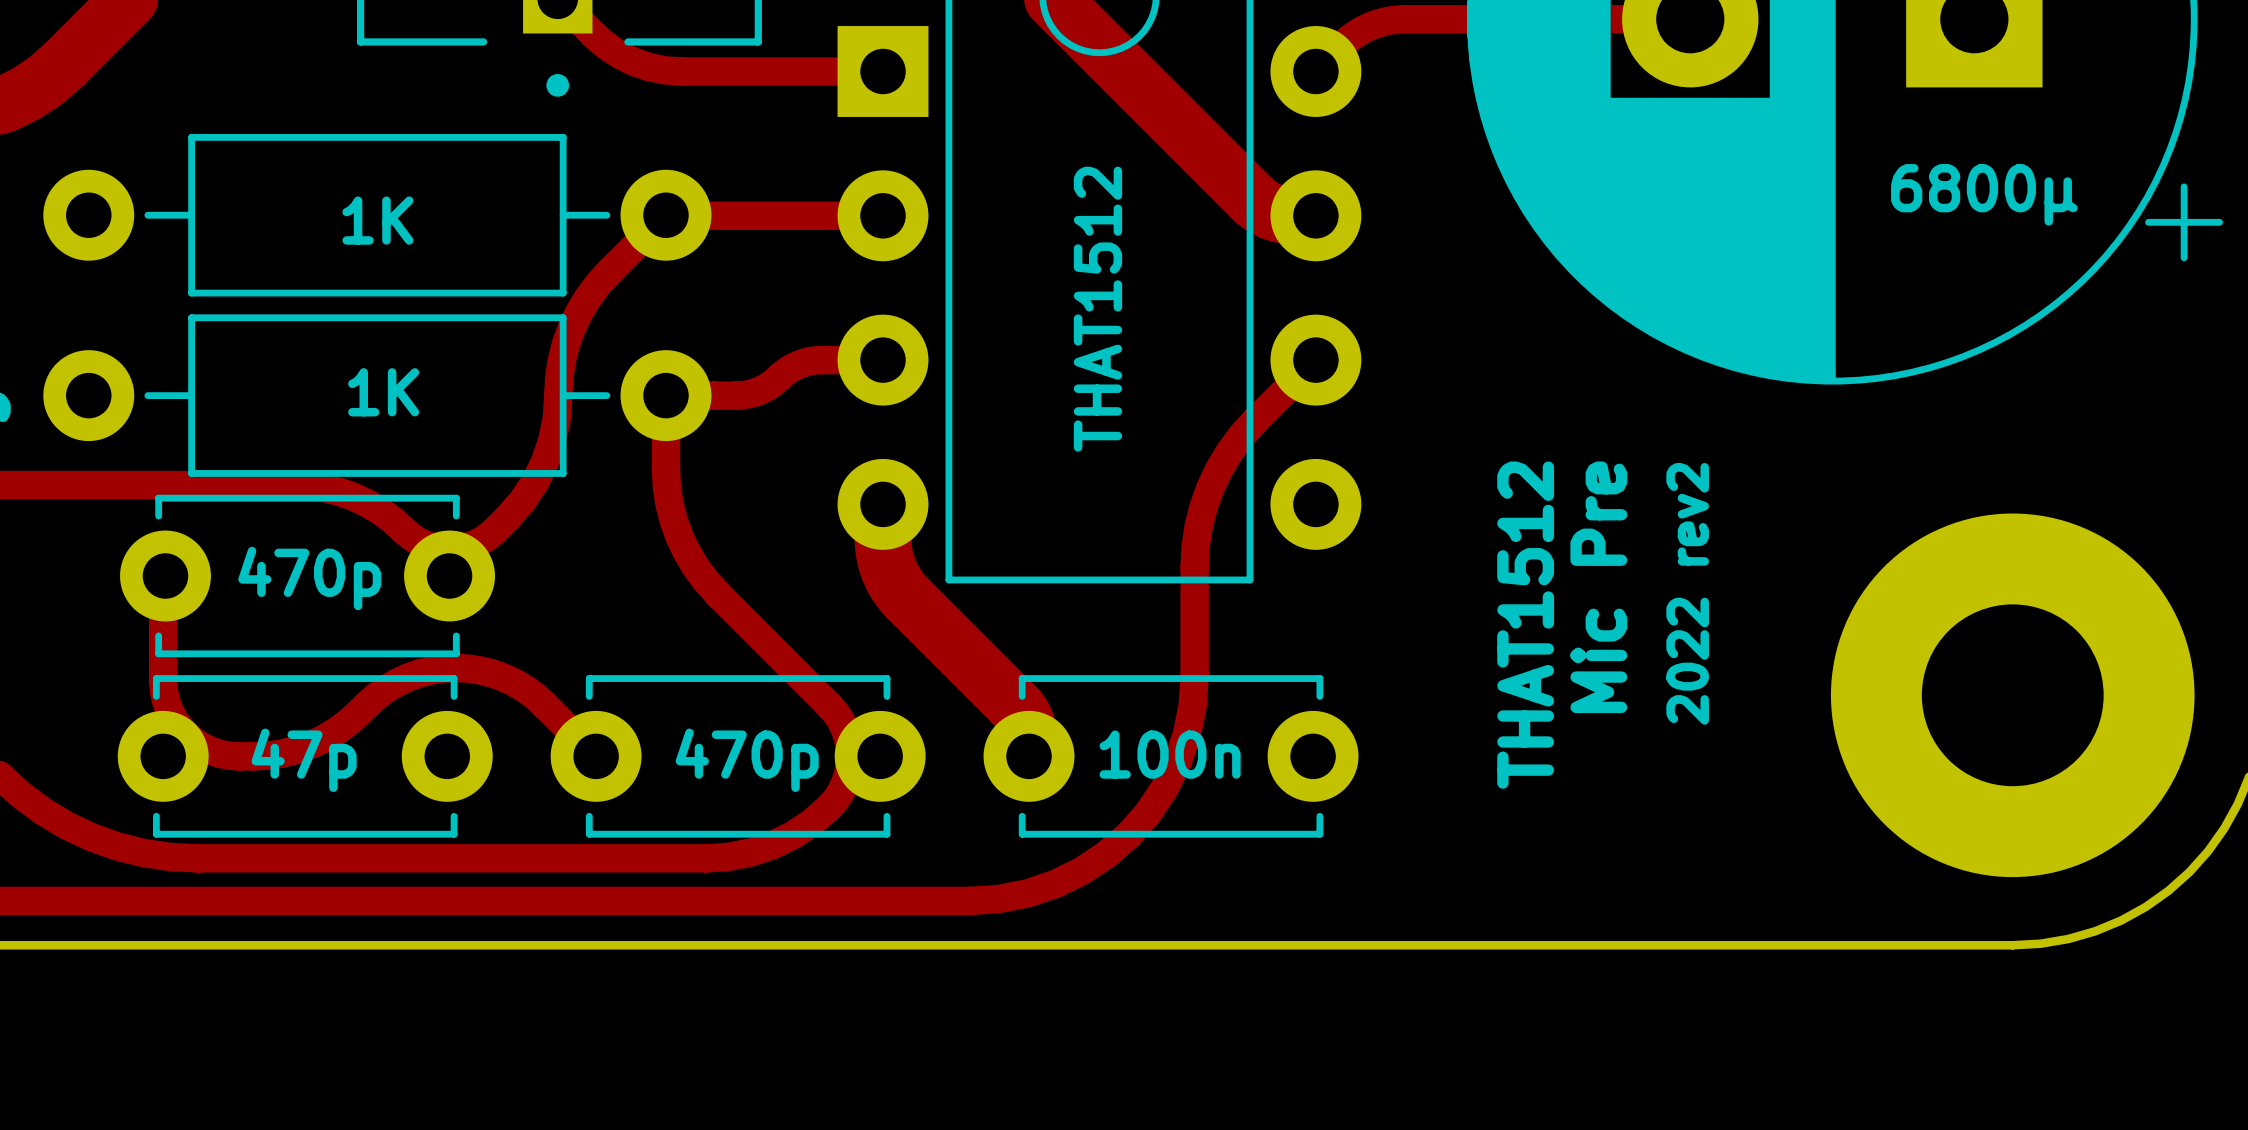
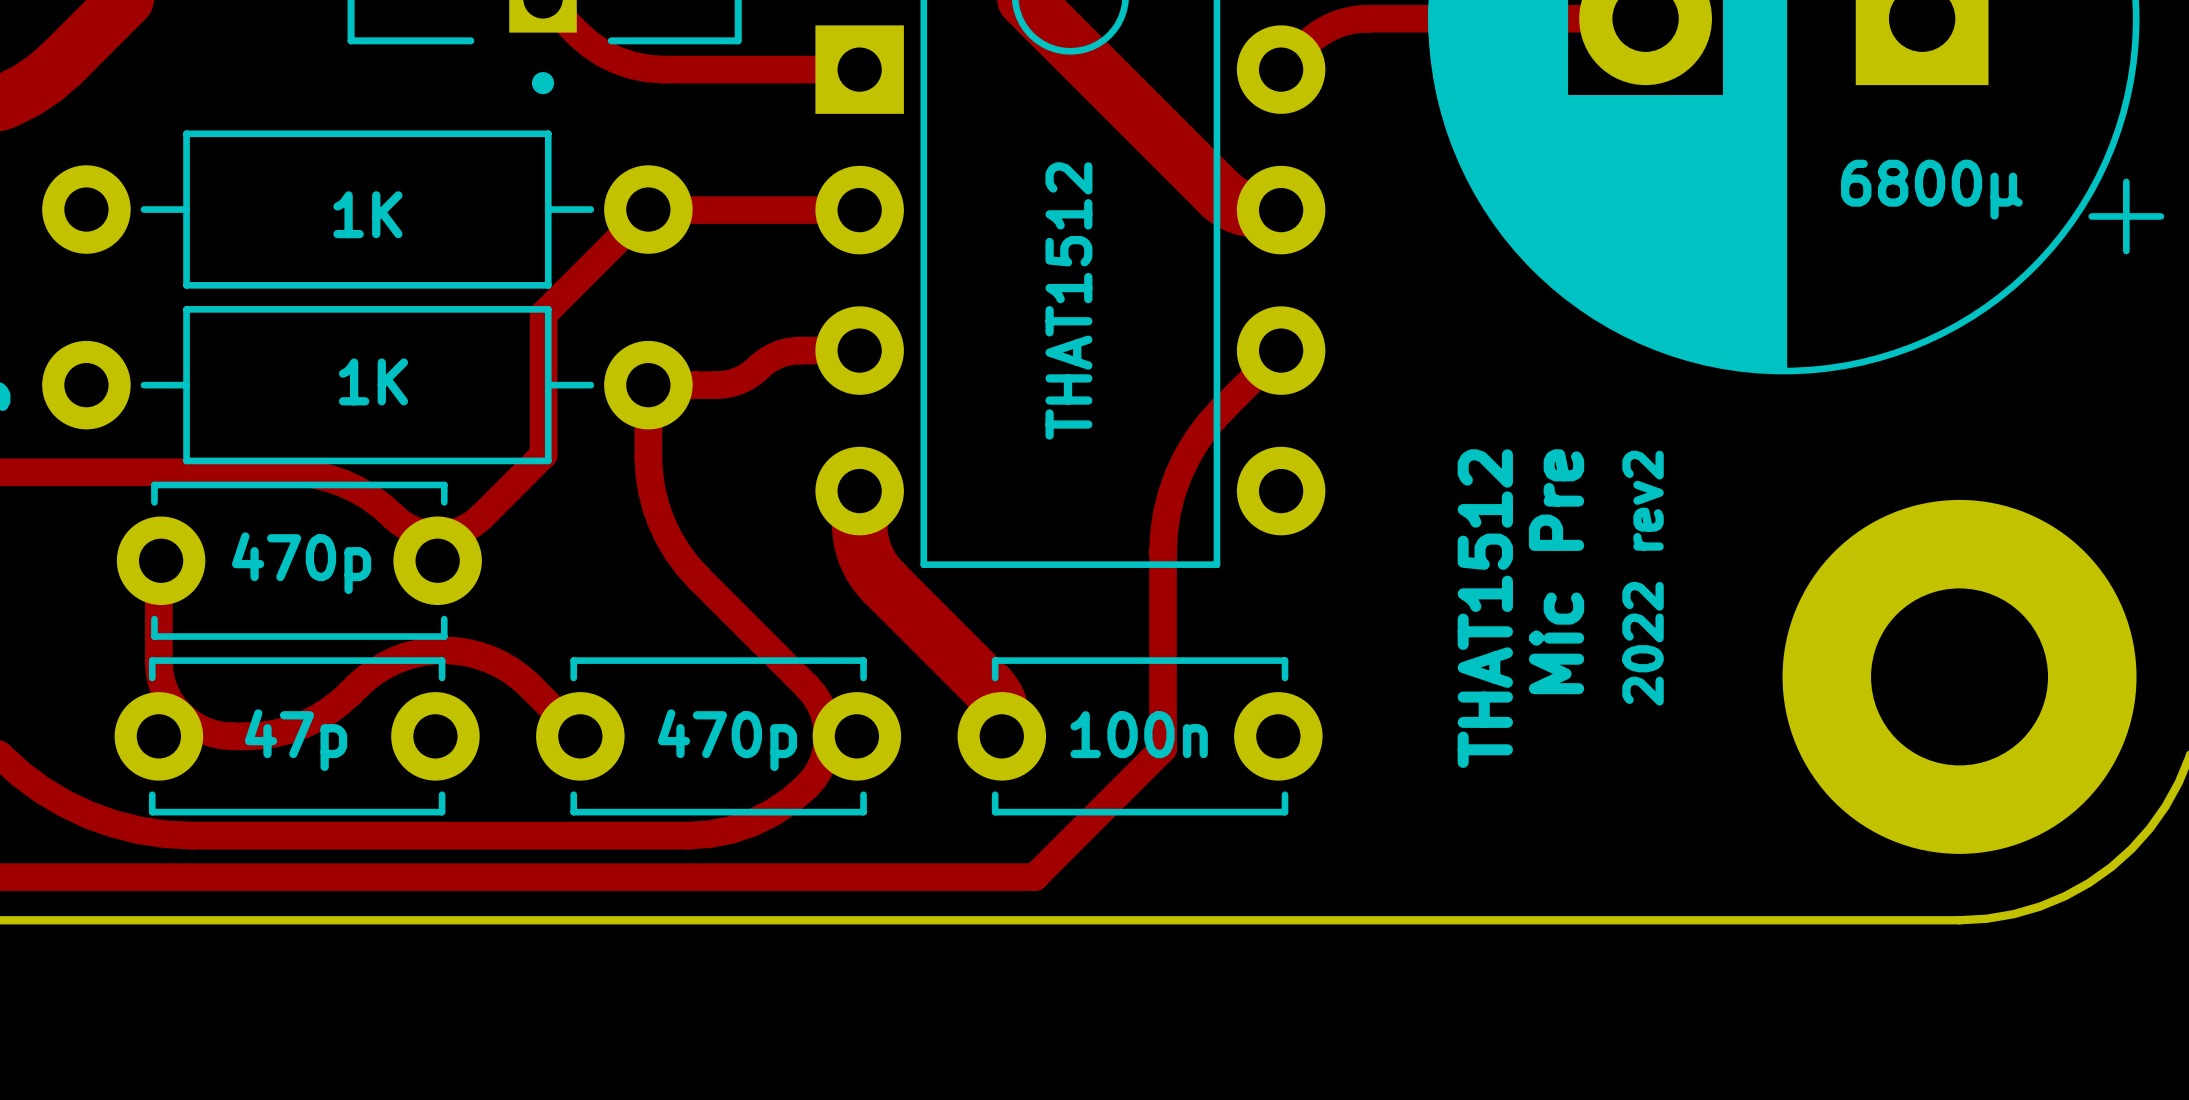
track: (609, 271) (587, 298) (571, 328) (561, 361) (556, 417) (552, 440) (535, 482) (507, 518) -> (593, 264) (543, 314) (543, 454) (493, 504)
track: (1194, 675) (1192, 705) (1186, 734) (1177, 762) (1164, 788) (1148, 812) (1128, 835) (1106, 854) (1082, 870) (1055, 883) (1027, 893) (999, 899) (969, 900) -> (1163, 658) (1163, 748) (1034, 877) (944, 877)

